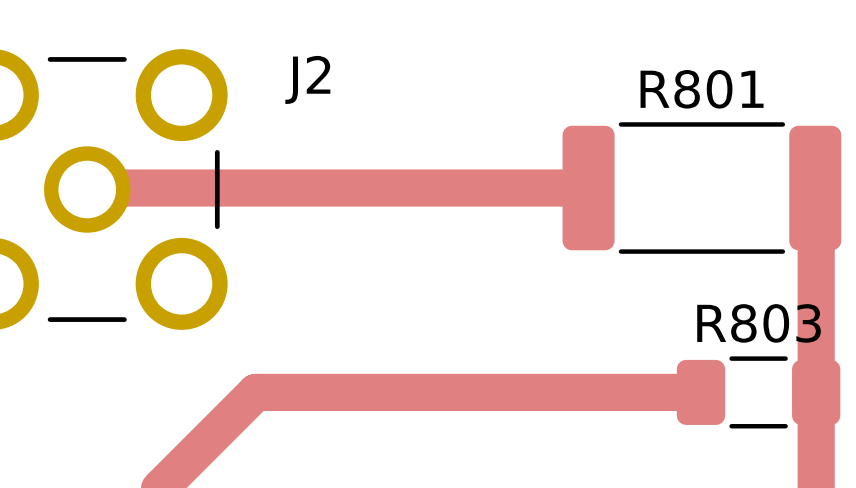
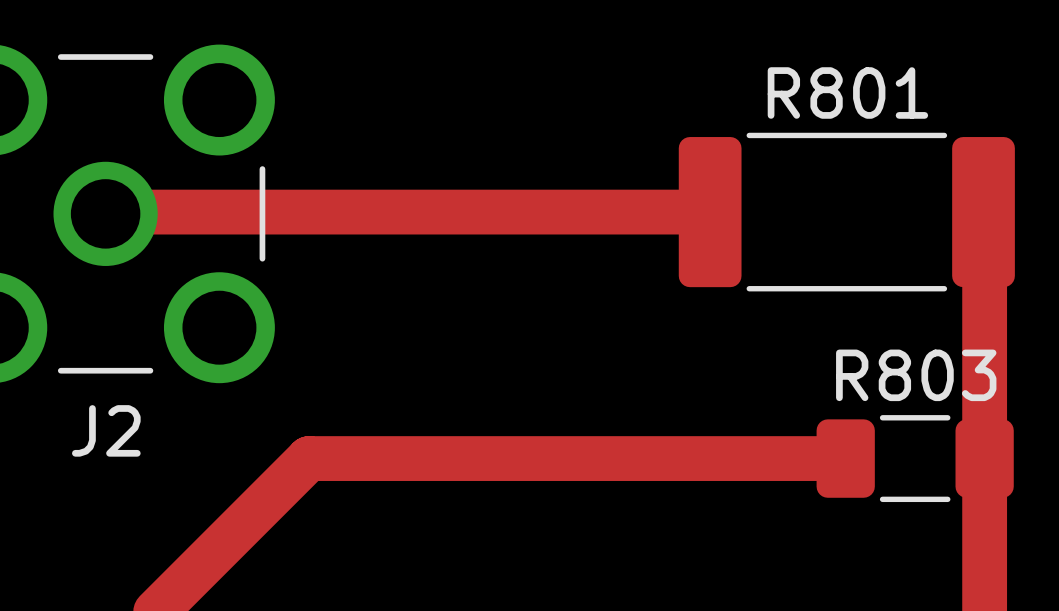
J2 name position: J2 (307, 79) -> J2 (106, 430)

